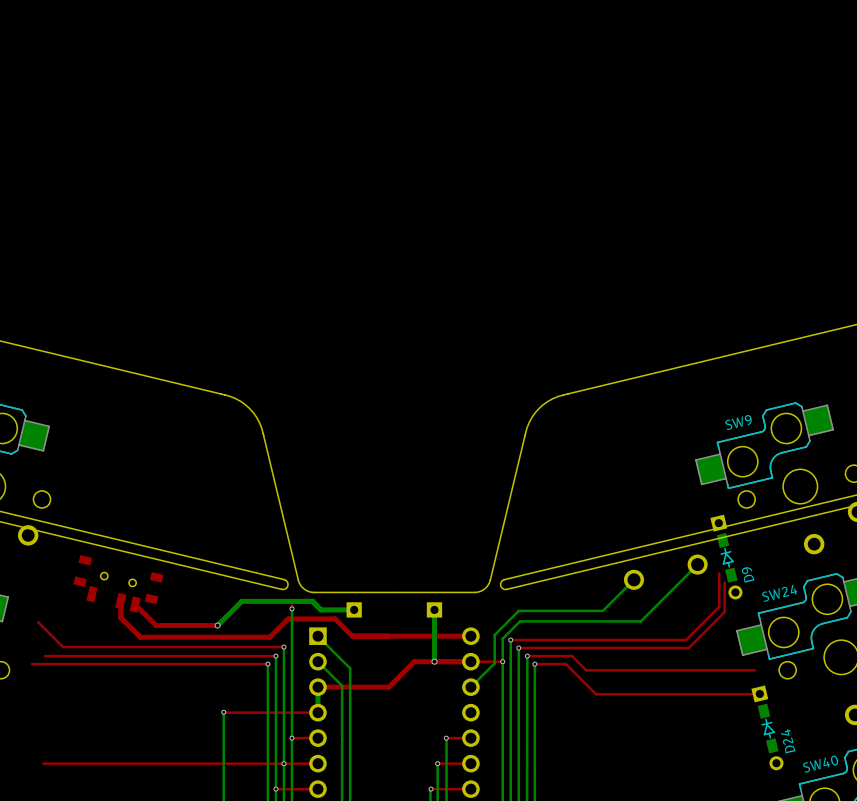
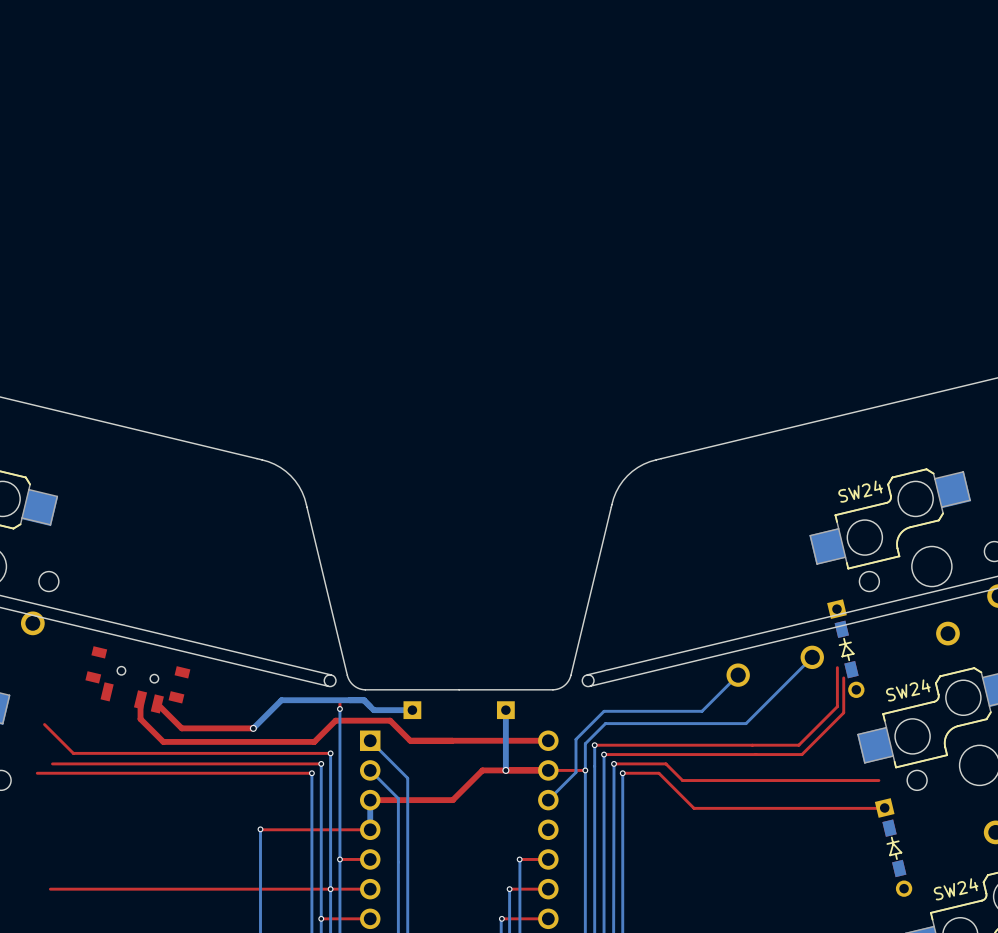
SW9 name: SW9 (738, 422) -> SW24 (860, 491)
D9 name: D9 (748, 575) -> none
round board edge: none -> [324, 674, 337, 687]
board edge: (284, 579) (287, 585) (281, 589) -> none
round board edge: none -> [582, 674, 595, 687]
board edge: (504, 579) (500, 585) (506, 589) -> none
D24 name: D24 (788, 741) -> none
SW40 name: SW40 (820, 764) -> SW24 (956, 889)

